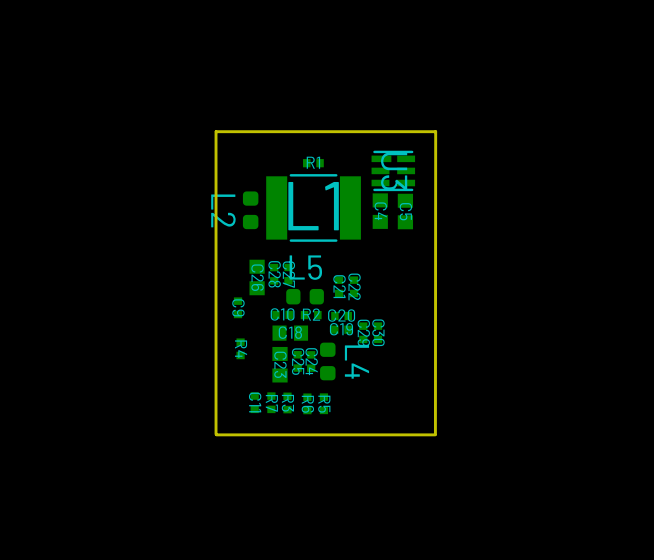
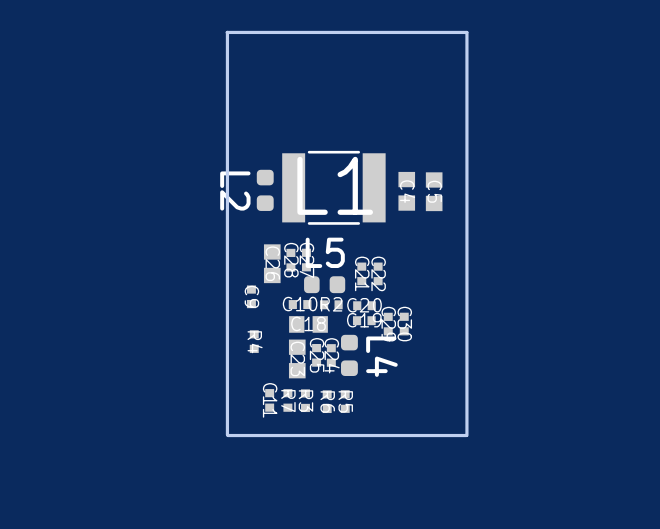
board edge: none -> (227, 32) (227, 104)
board edge: none -> (466, 32) (227, 32)
board edge: (216, 131) (435, 131) (435, 434) -> (466, 32) (466, 435)
R1: (313, 163) -> none
U3: (393, 170) -> none

